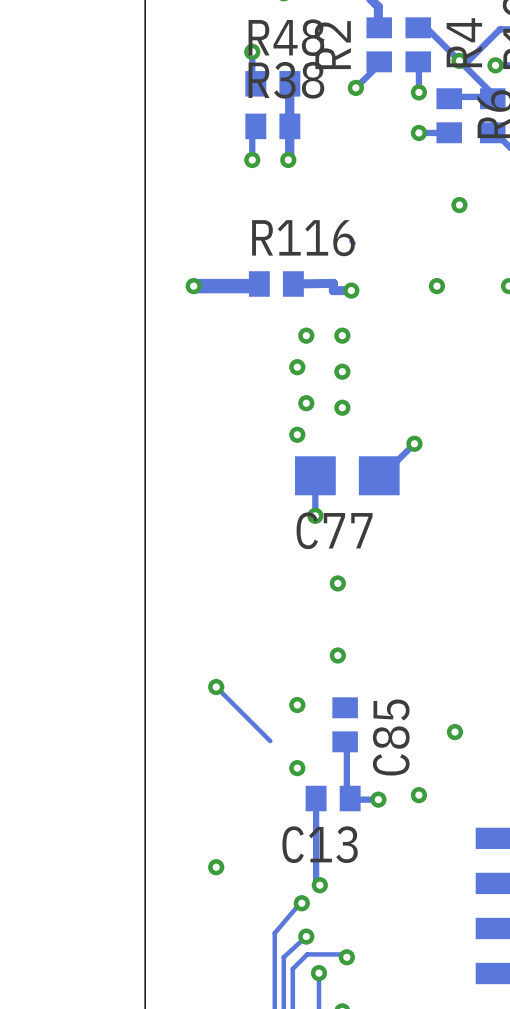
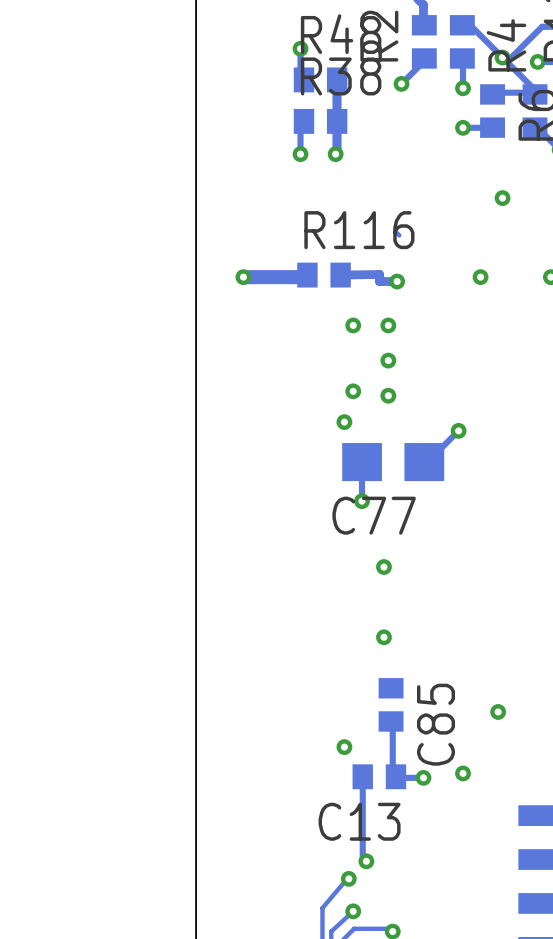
via: (297, 367) -> none
track: (216, 687) (270, 741) -> none
via: (216, 687) -> none
via: (297, 705) -> none
via: (216, 867) -> none

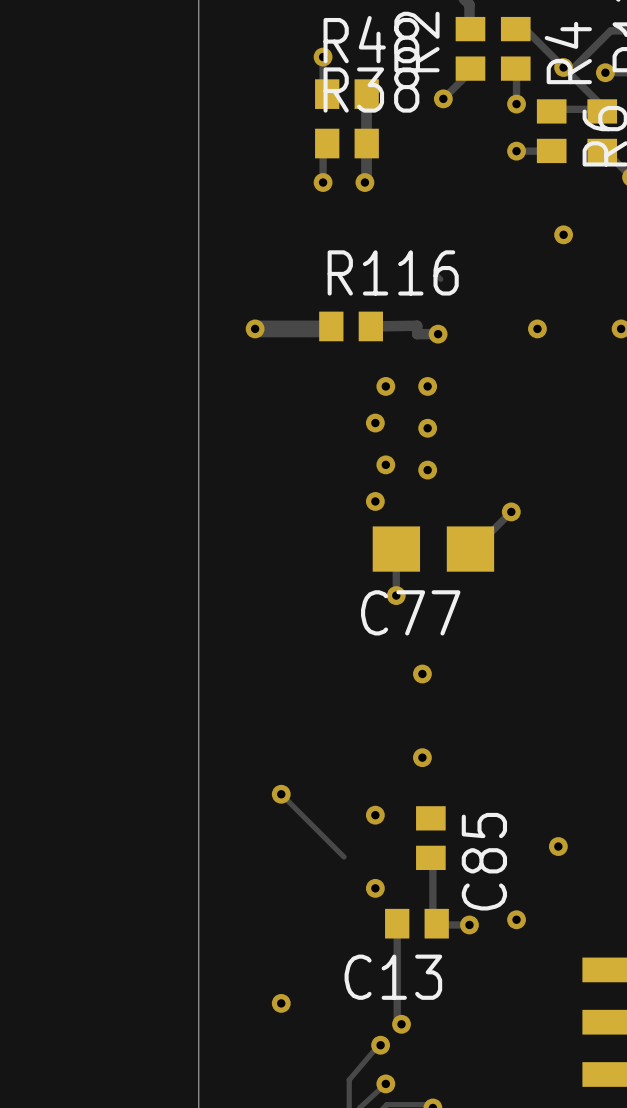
via: none -> (375, 423)
track: none -> (281, 794) (344, 857)
via: none -> (281, 794)
via: none -> (375, 815)
via: none -> (281, 1003)

